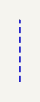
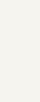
line: (19, 19) (19, 81) -> none

